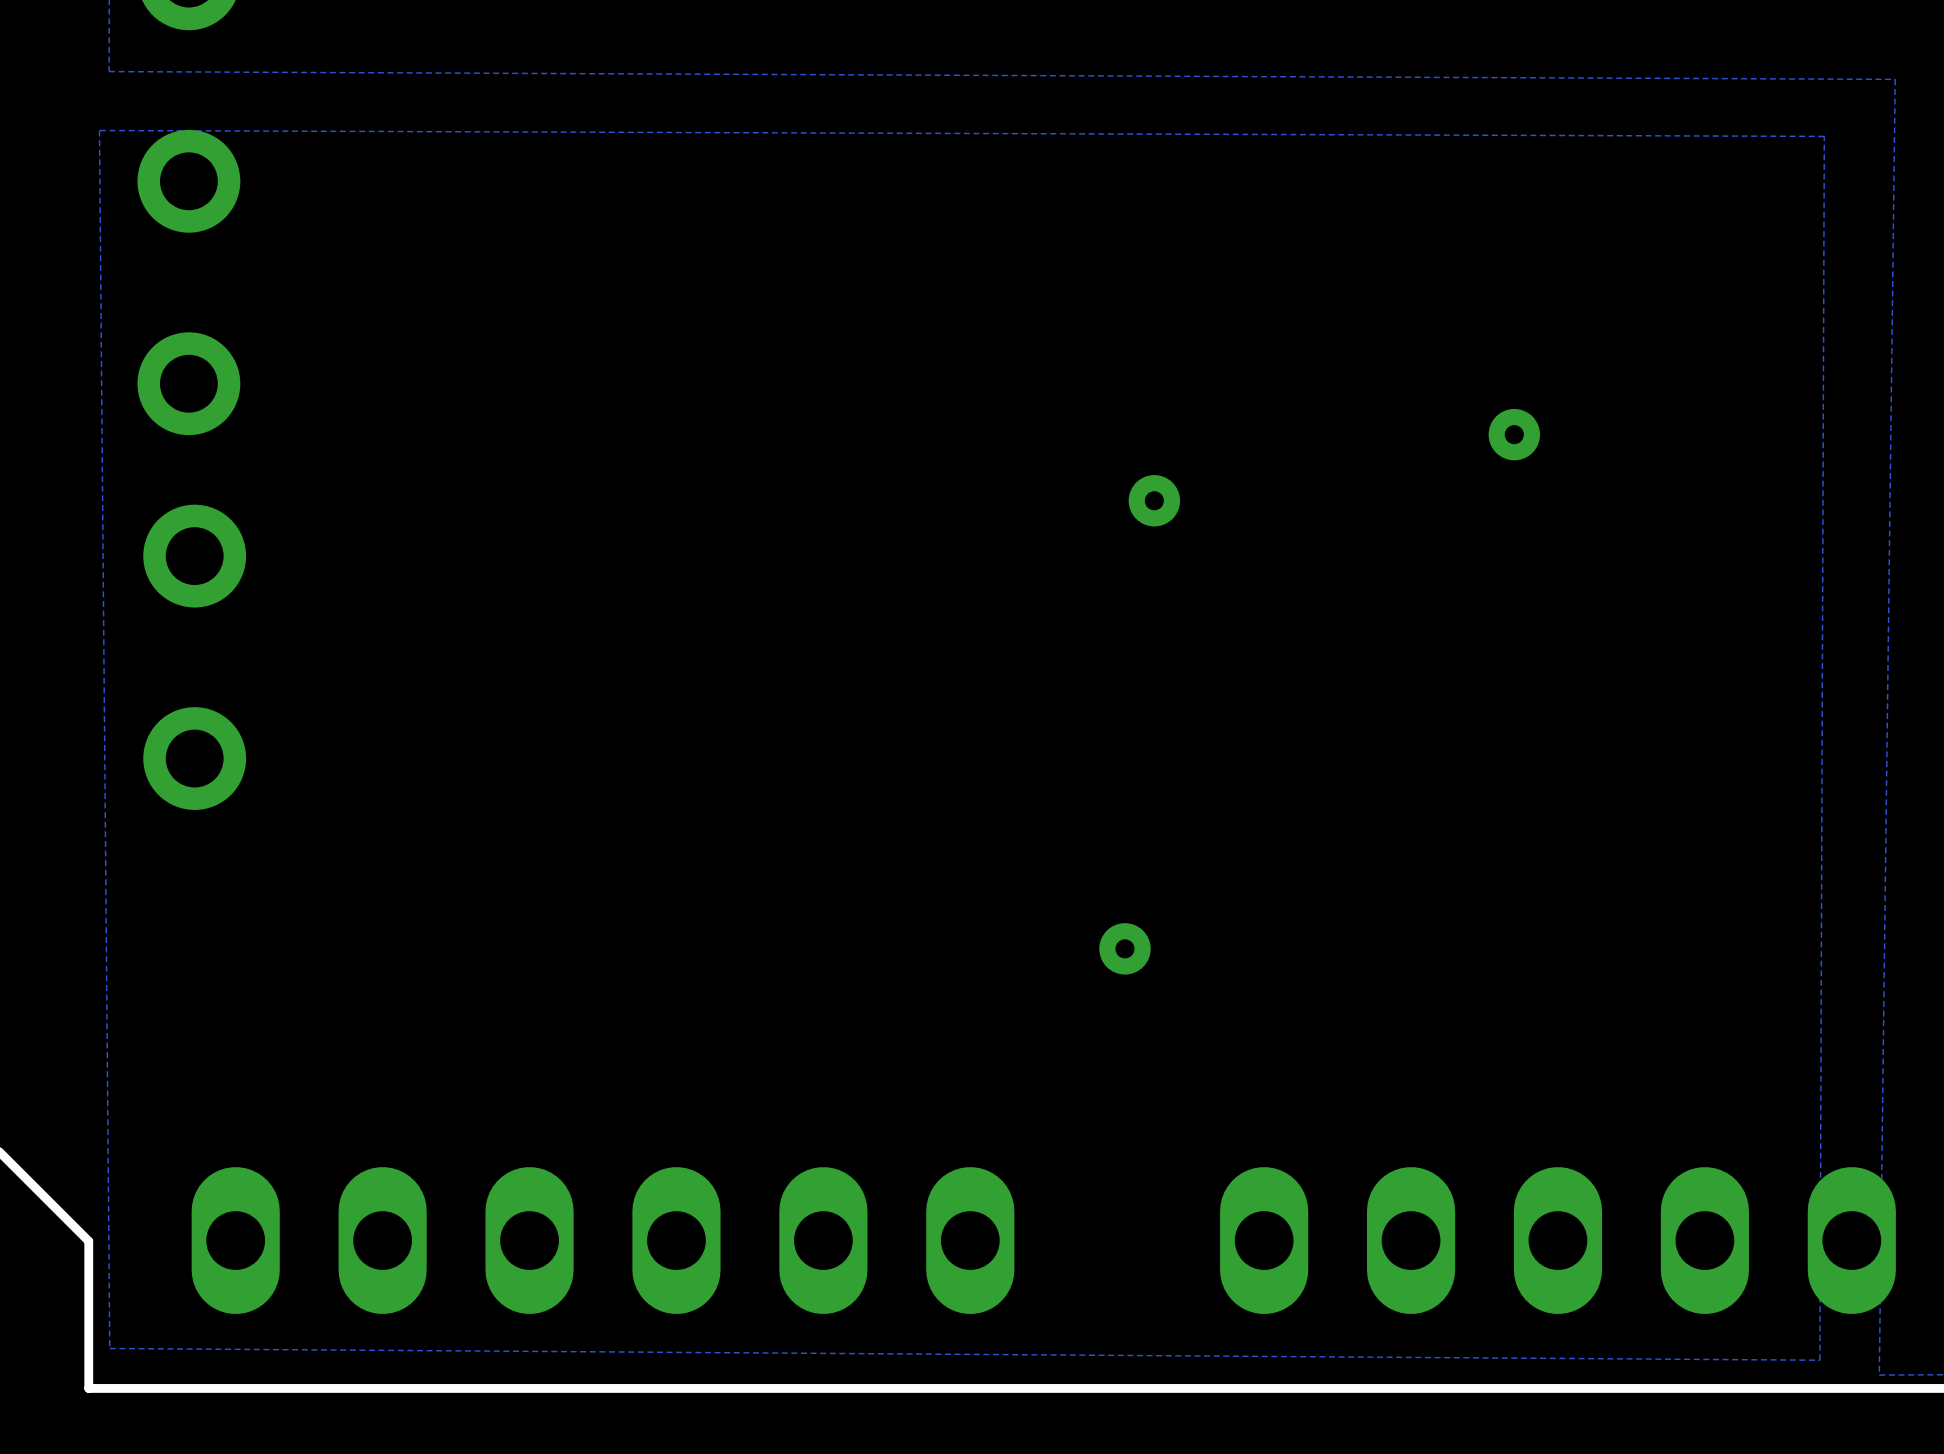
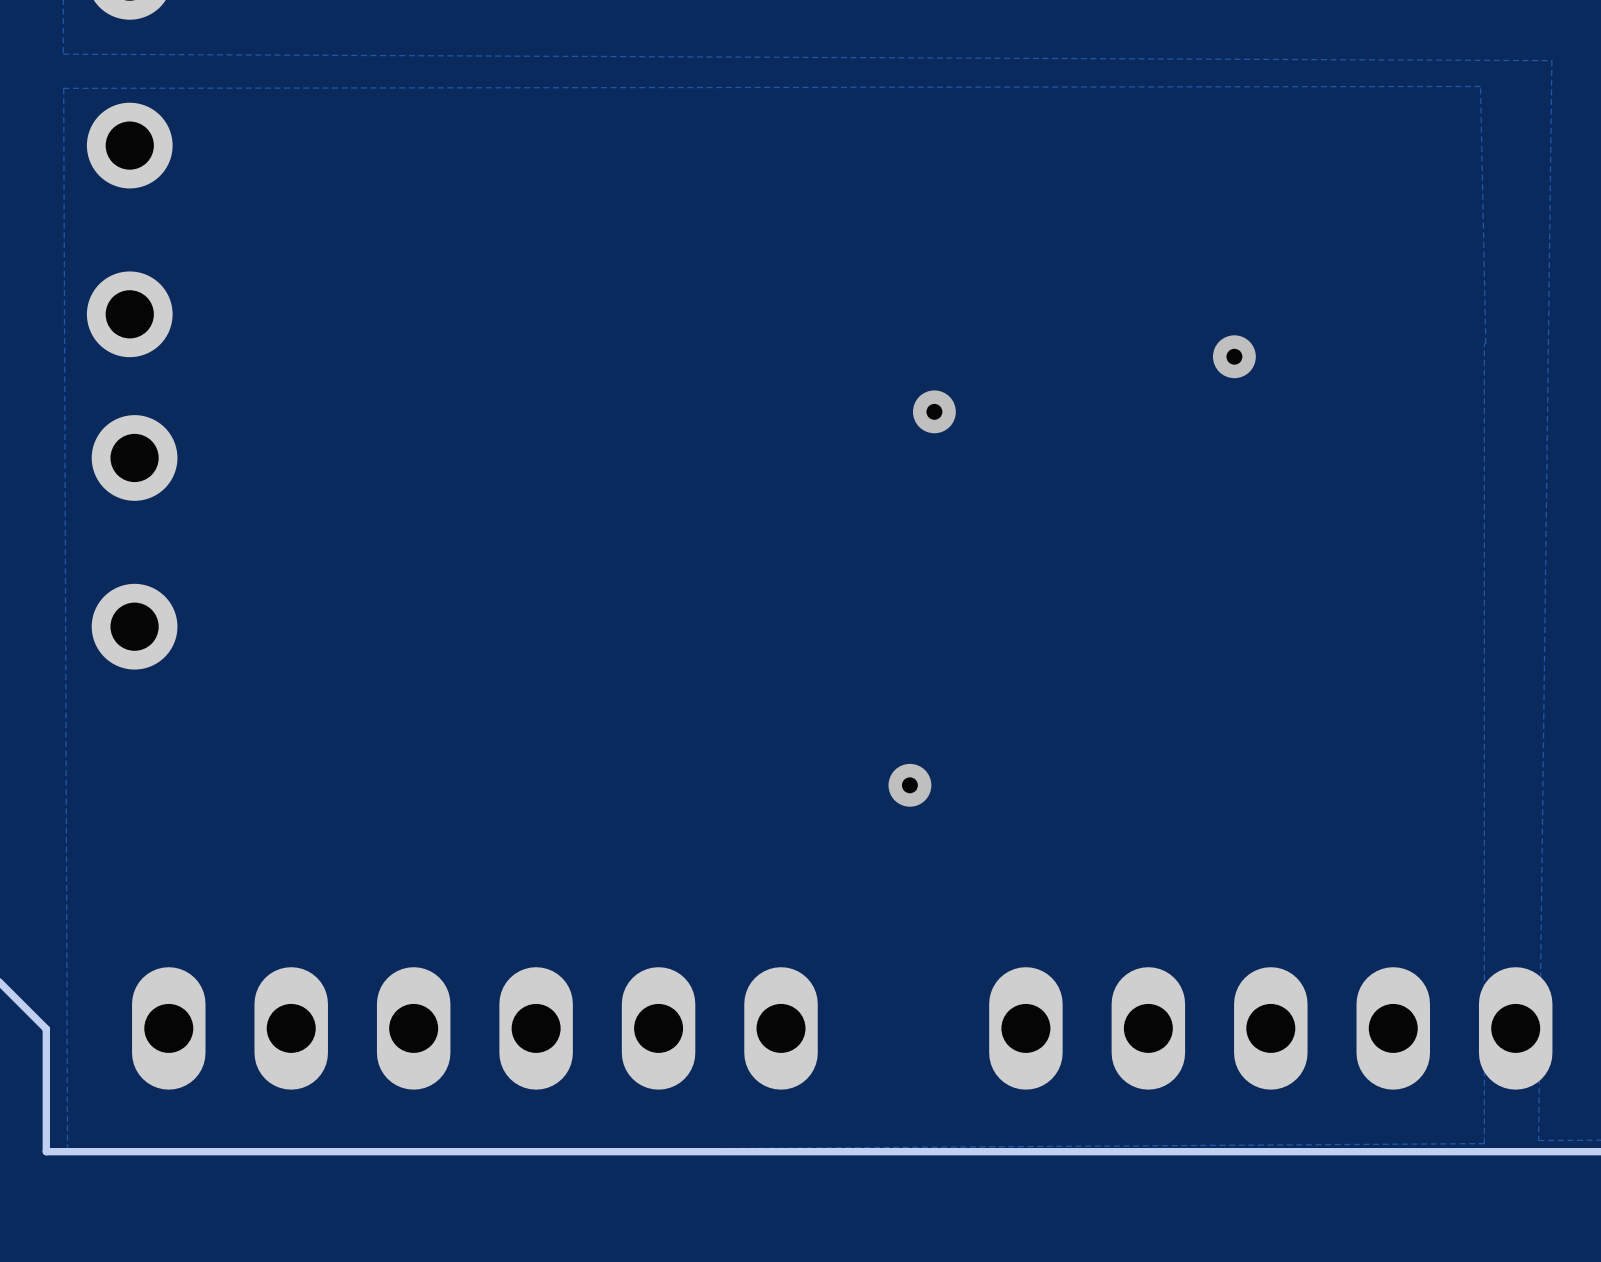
zone outline: (99, 130) (1824, 136) (1819, 1360) (109, 1348) (99, 130) -> (1480, 86) (1485, 343) (1484, 1143) (67, 1152) (63, 88) (1480, 86)

